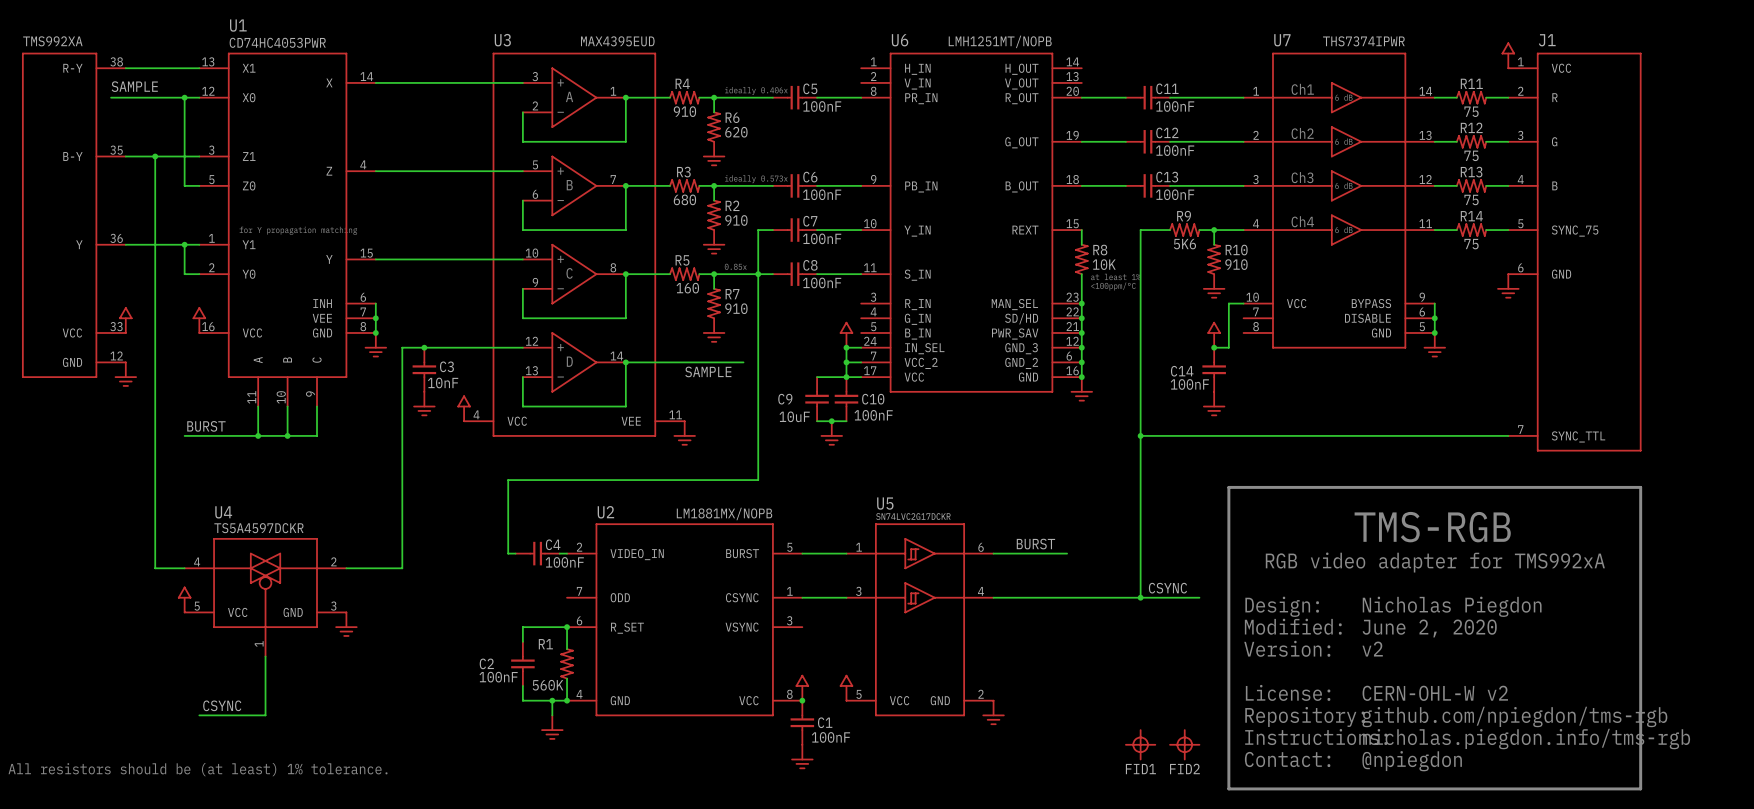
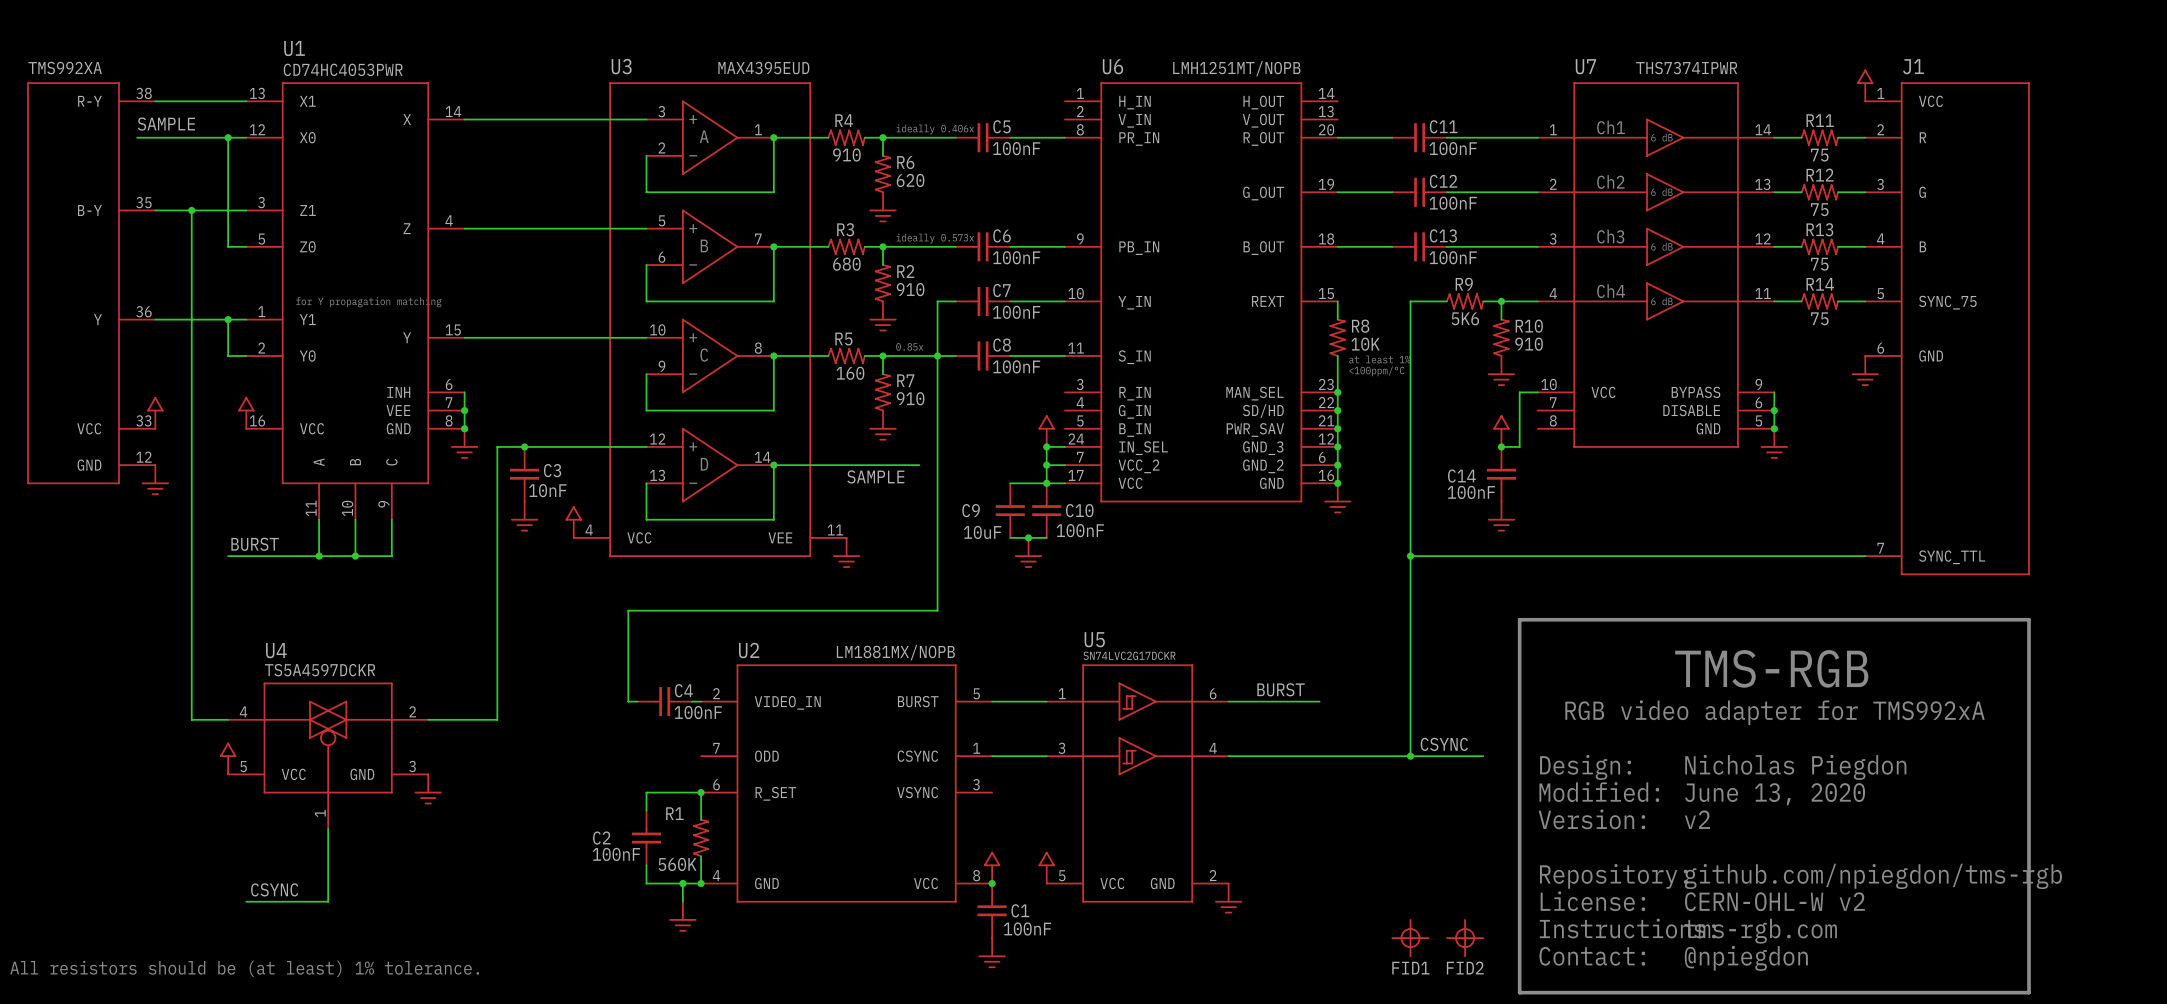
text: June 2, 2020 (1429, 628) -> June 13, 2020 (1775, 794)
text: License: (1288, 692) -> Repository: (1613, 876)
text: CERN-OHL-W v2 (1435, 693) -> github.com/npiegdon/tms-rgb (1873, 876)
text: Repository: (1304, 716) -> License: (1592, 901)
text: github.com/npiegdon/tms-rgb (1514, 716) -> CERN-OHL-W v2 (1774, 901)
text: nicholas.piegdon.info/tms-rgb (1526, 739) -> tms-rgb.com (1760, 931)

